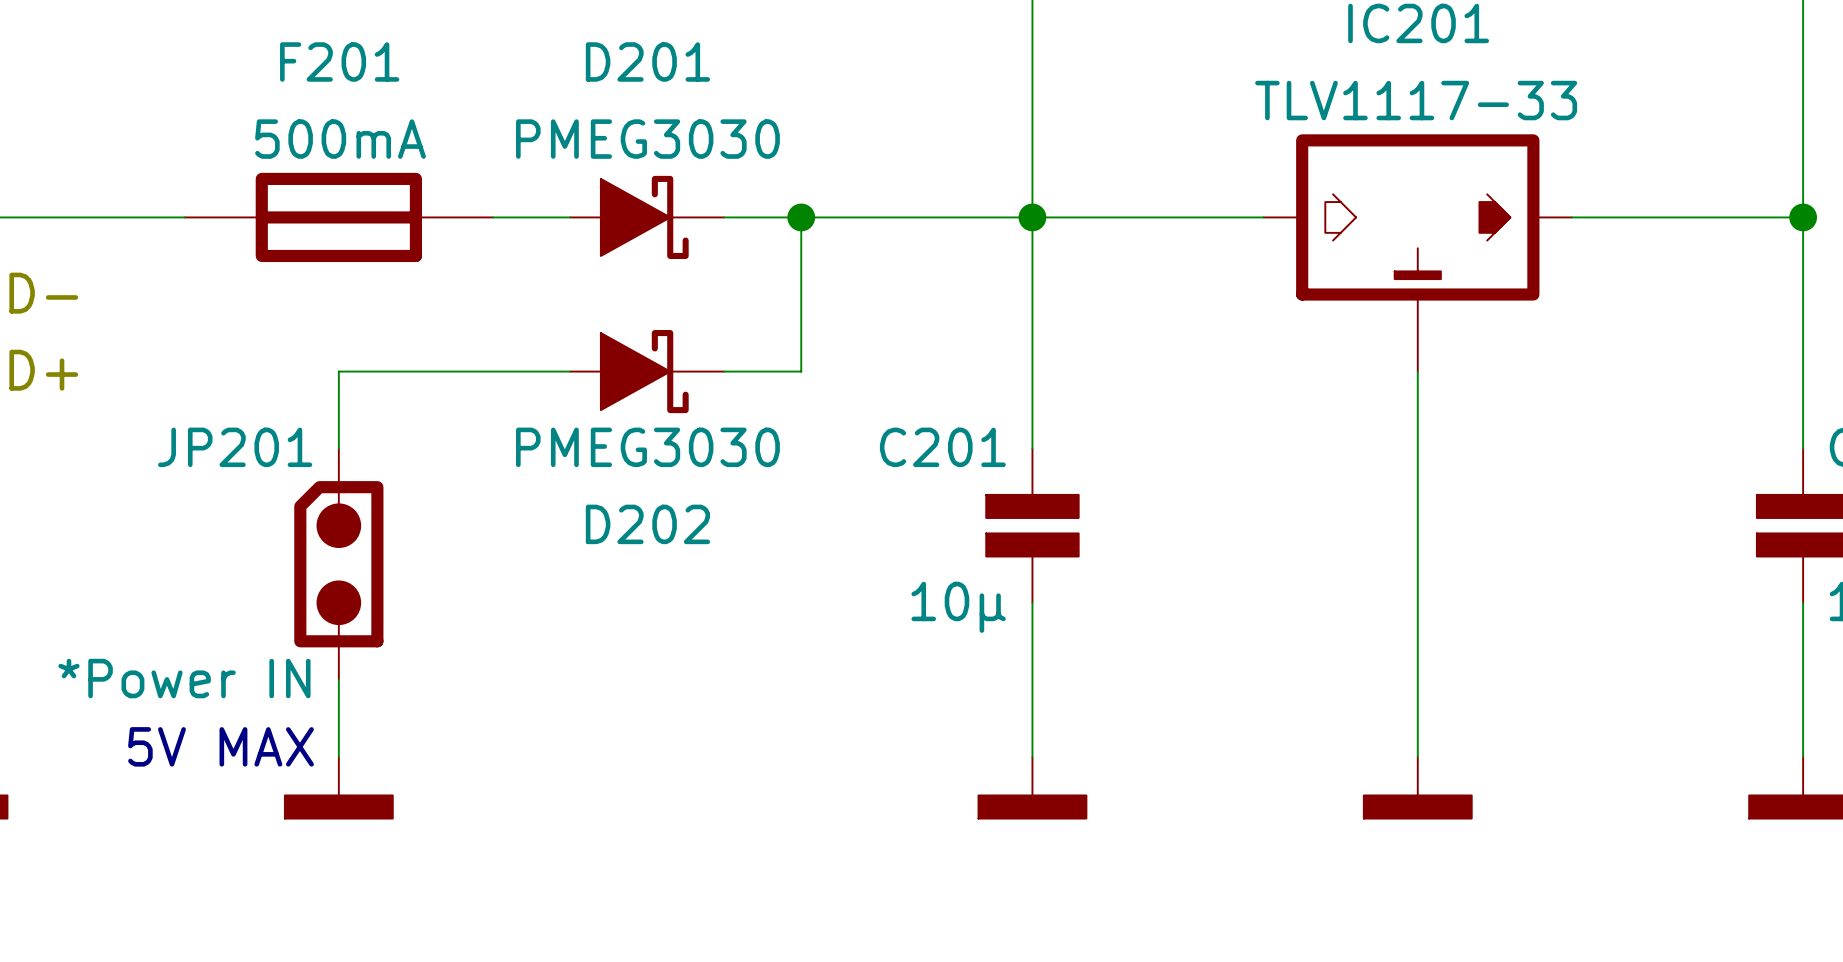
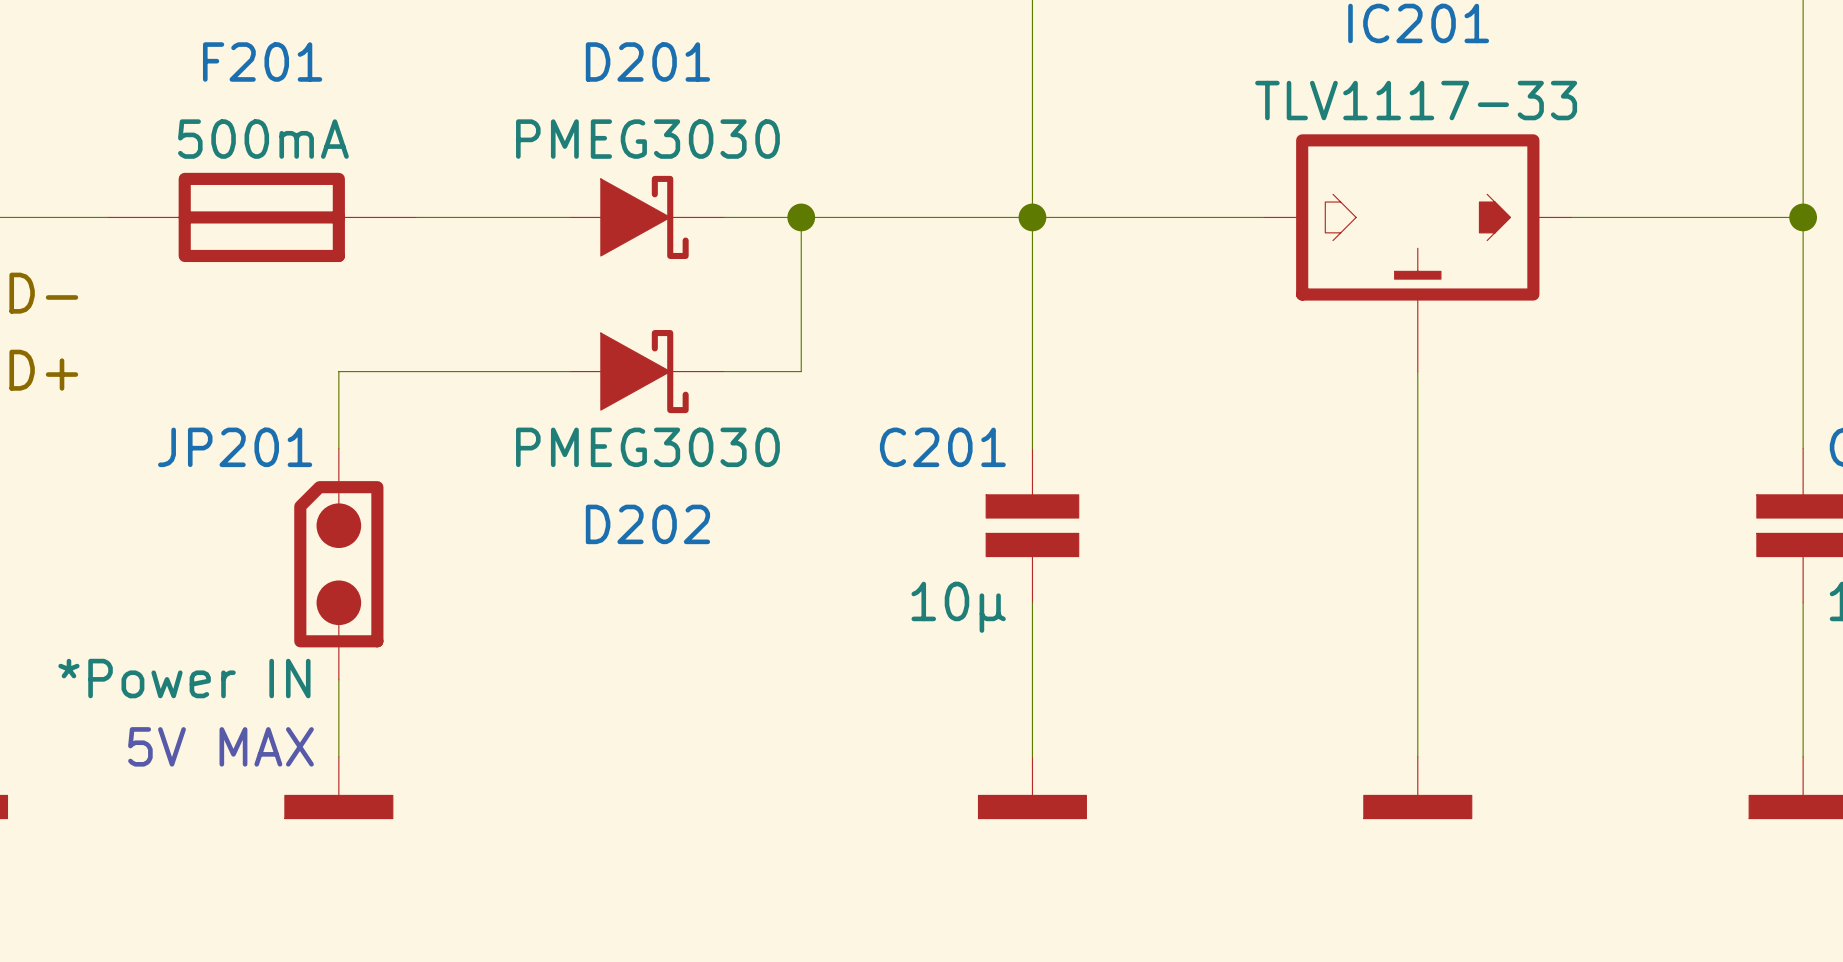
F201 position: (338, 217) -> (261, 217)

